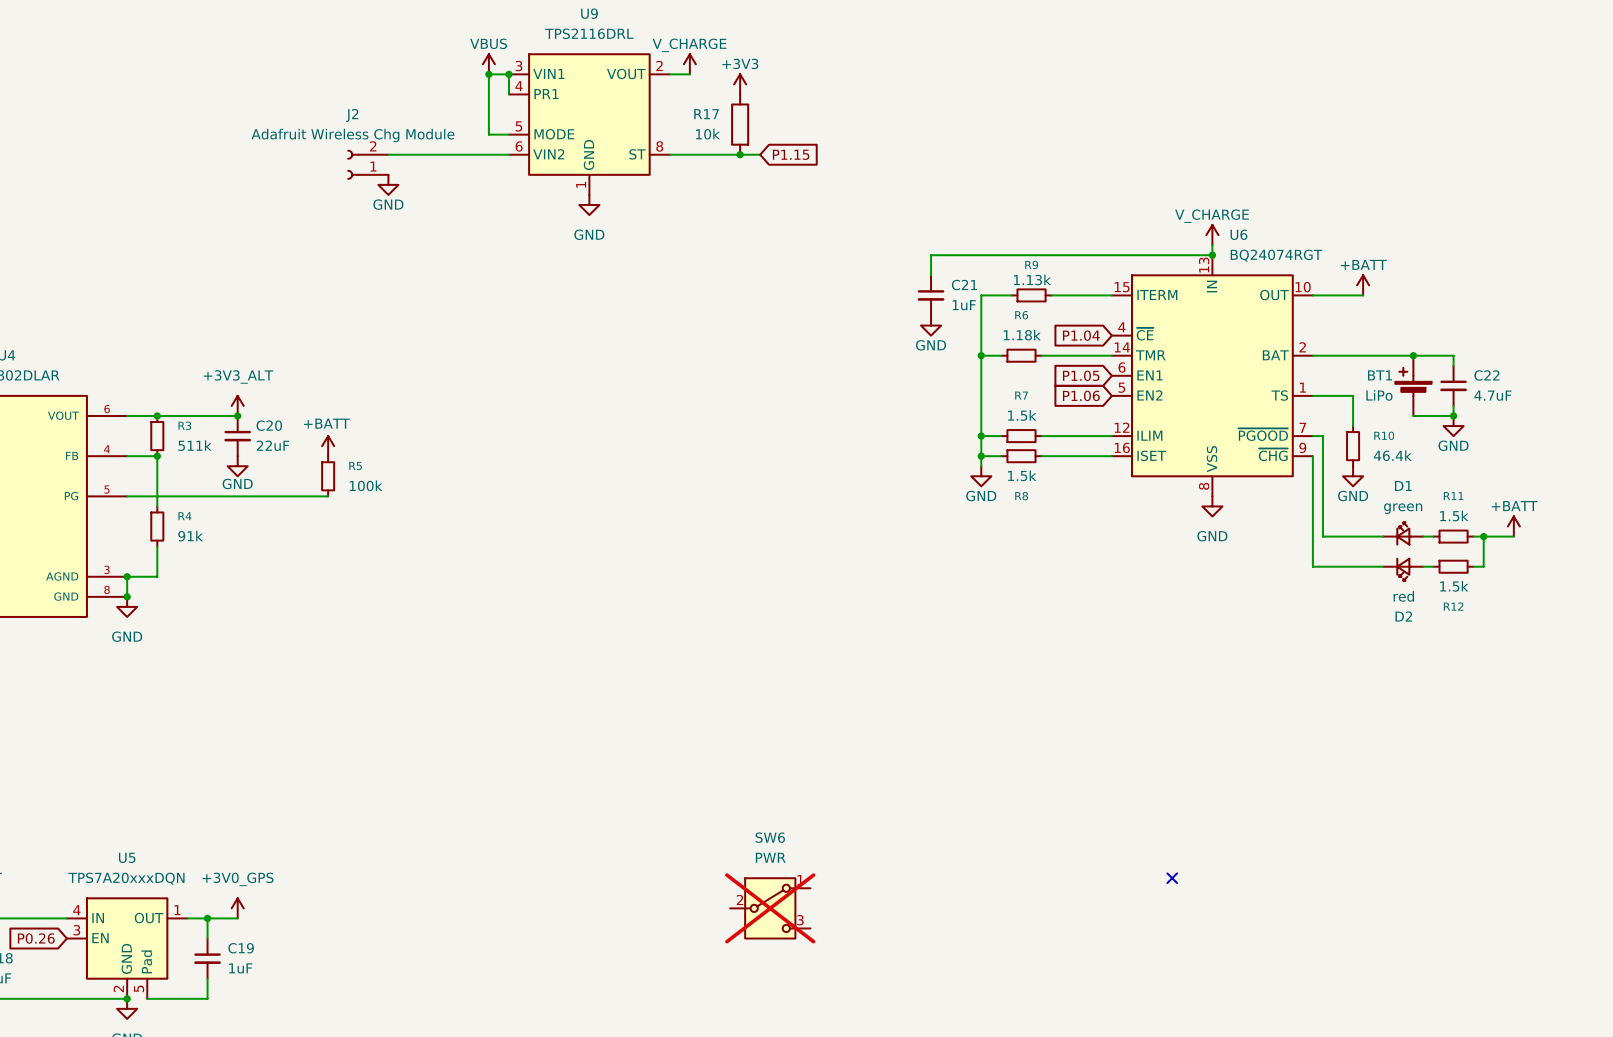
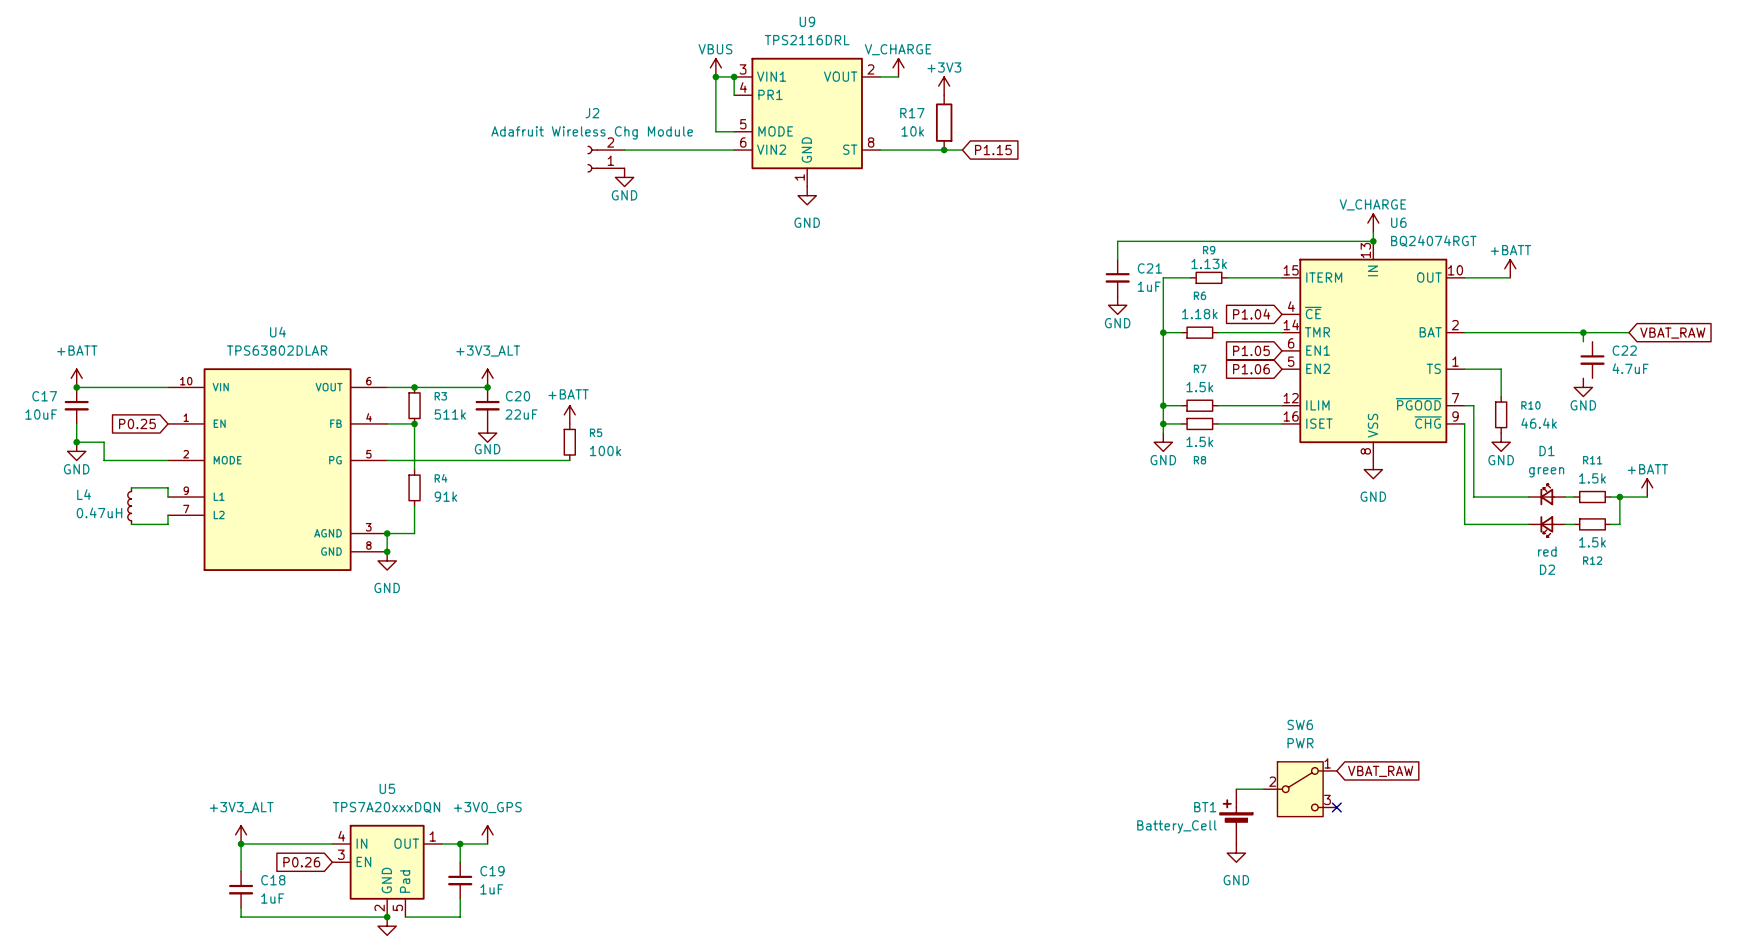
junction position: (1413, 355) -> (1583, 332)
wire: none -> (1583, 332) (1583, 341)
wire: (1453, 355) (1453, 365) -> (1592, 332) (1629, 332)
global label: none -> VBAT_RAW (1672, 333)
BT1 position: (1413, 385) -> (1236, 816)
BT1 value: LiPo (1379, 395) -> Battery_Cell (1176, 826)
wire: (1453, 405) (1453, 415) (1413, 415) -> none
junction: (1453, 415) -> none
power symbol position: GND (1453, 426) -> GND (1583, 387)
global label: none -> VBAT_RAW (1380, 771)
wire: none -> (1236, 789) (1263, 789)
SW6 position: (770, 908) -> (1300, 789)
SW6 do-not-place cross: (770, 908) -> none
power symbol: none -> GND (1236, 853)

